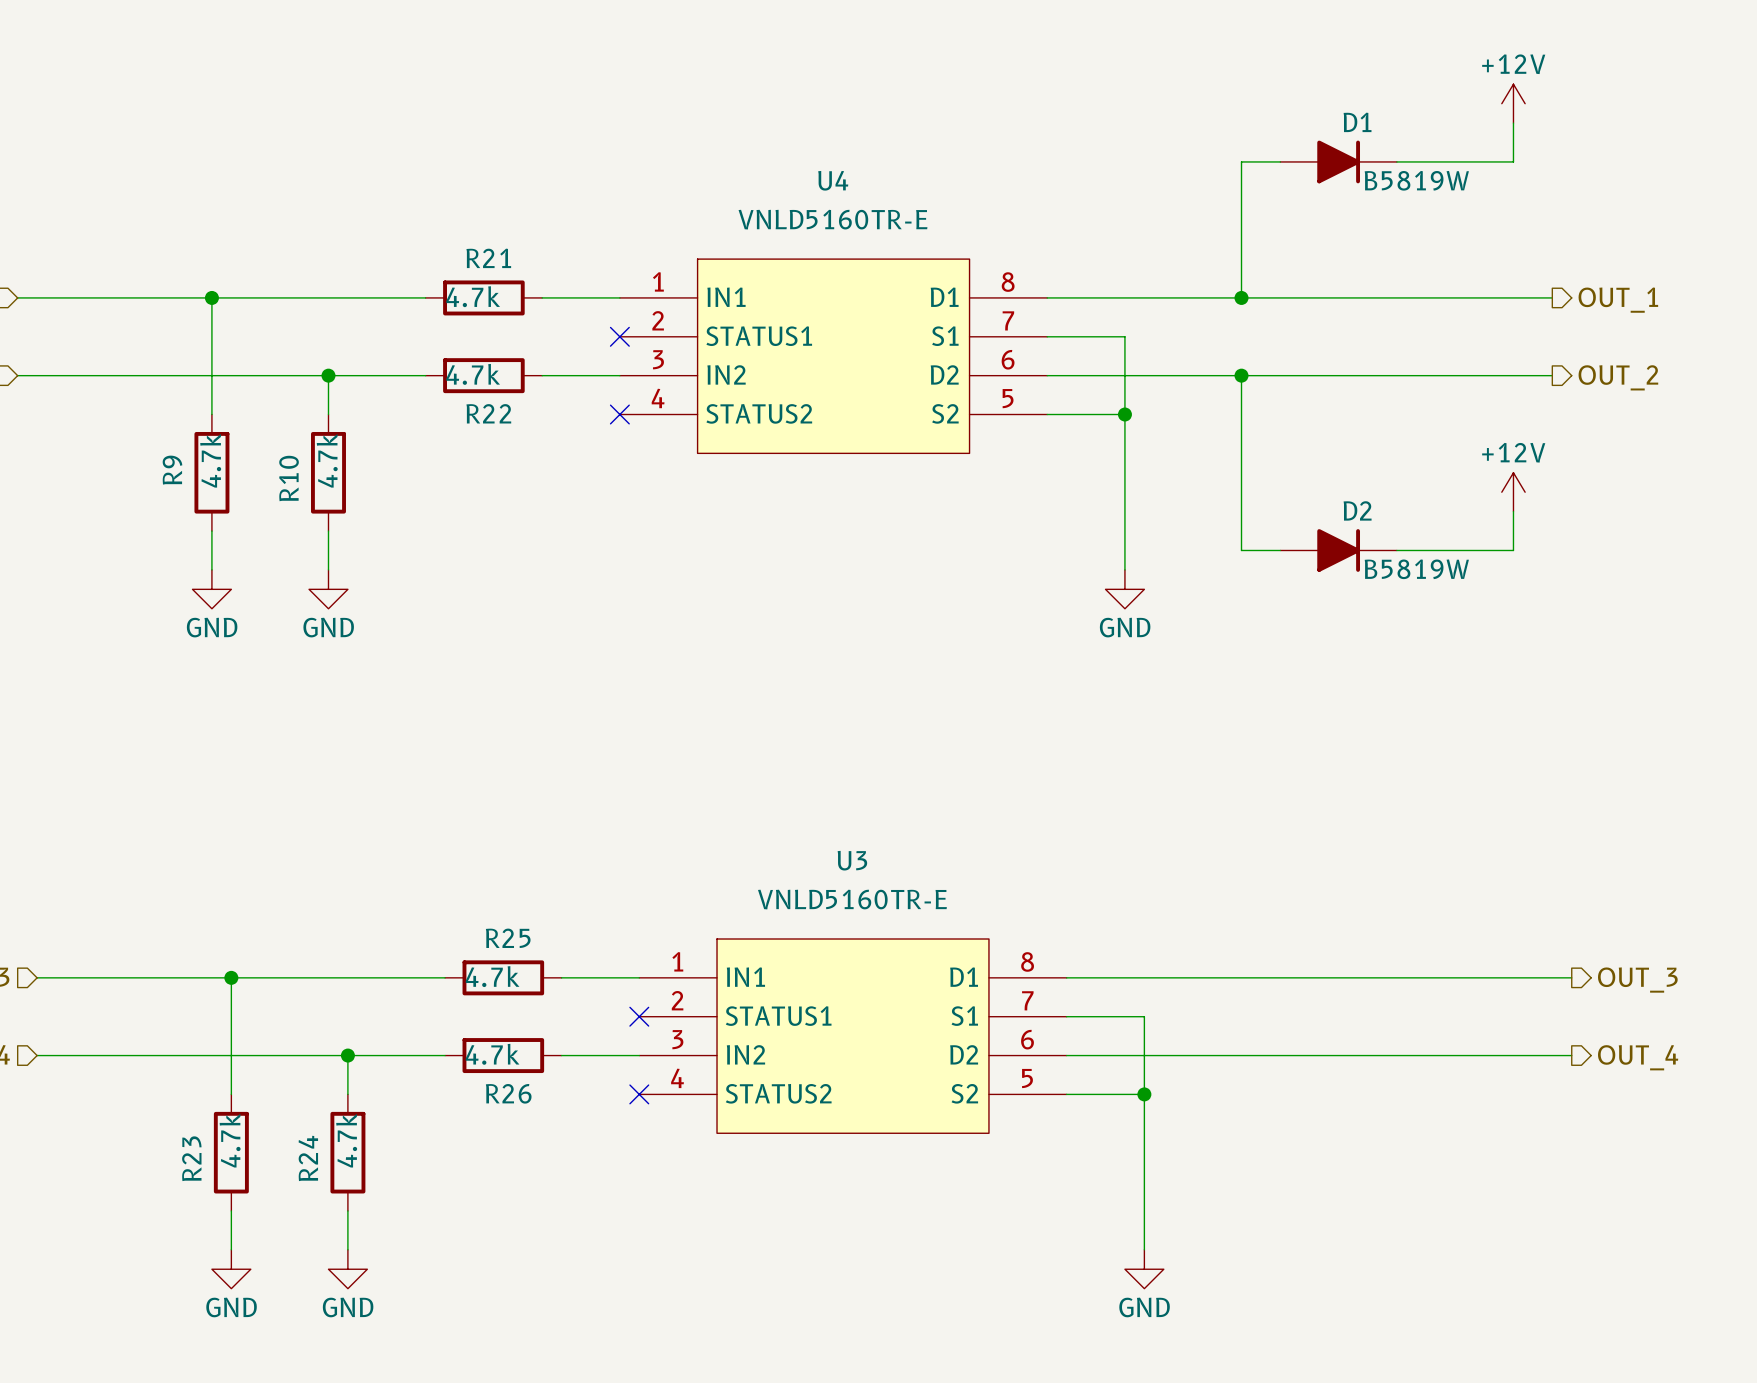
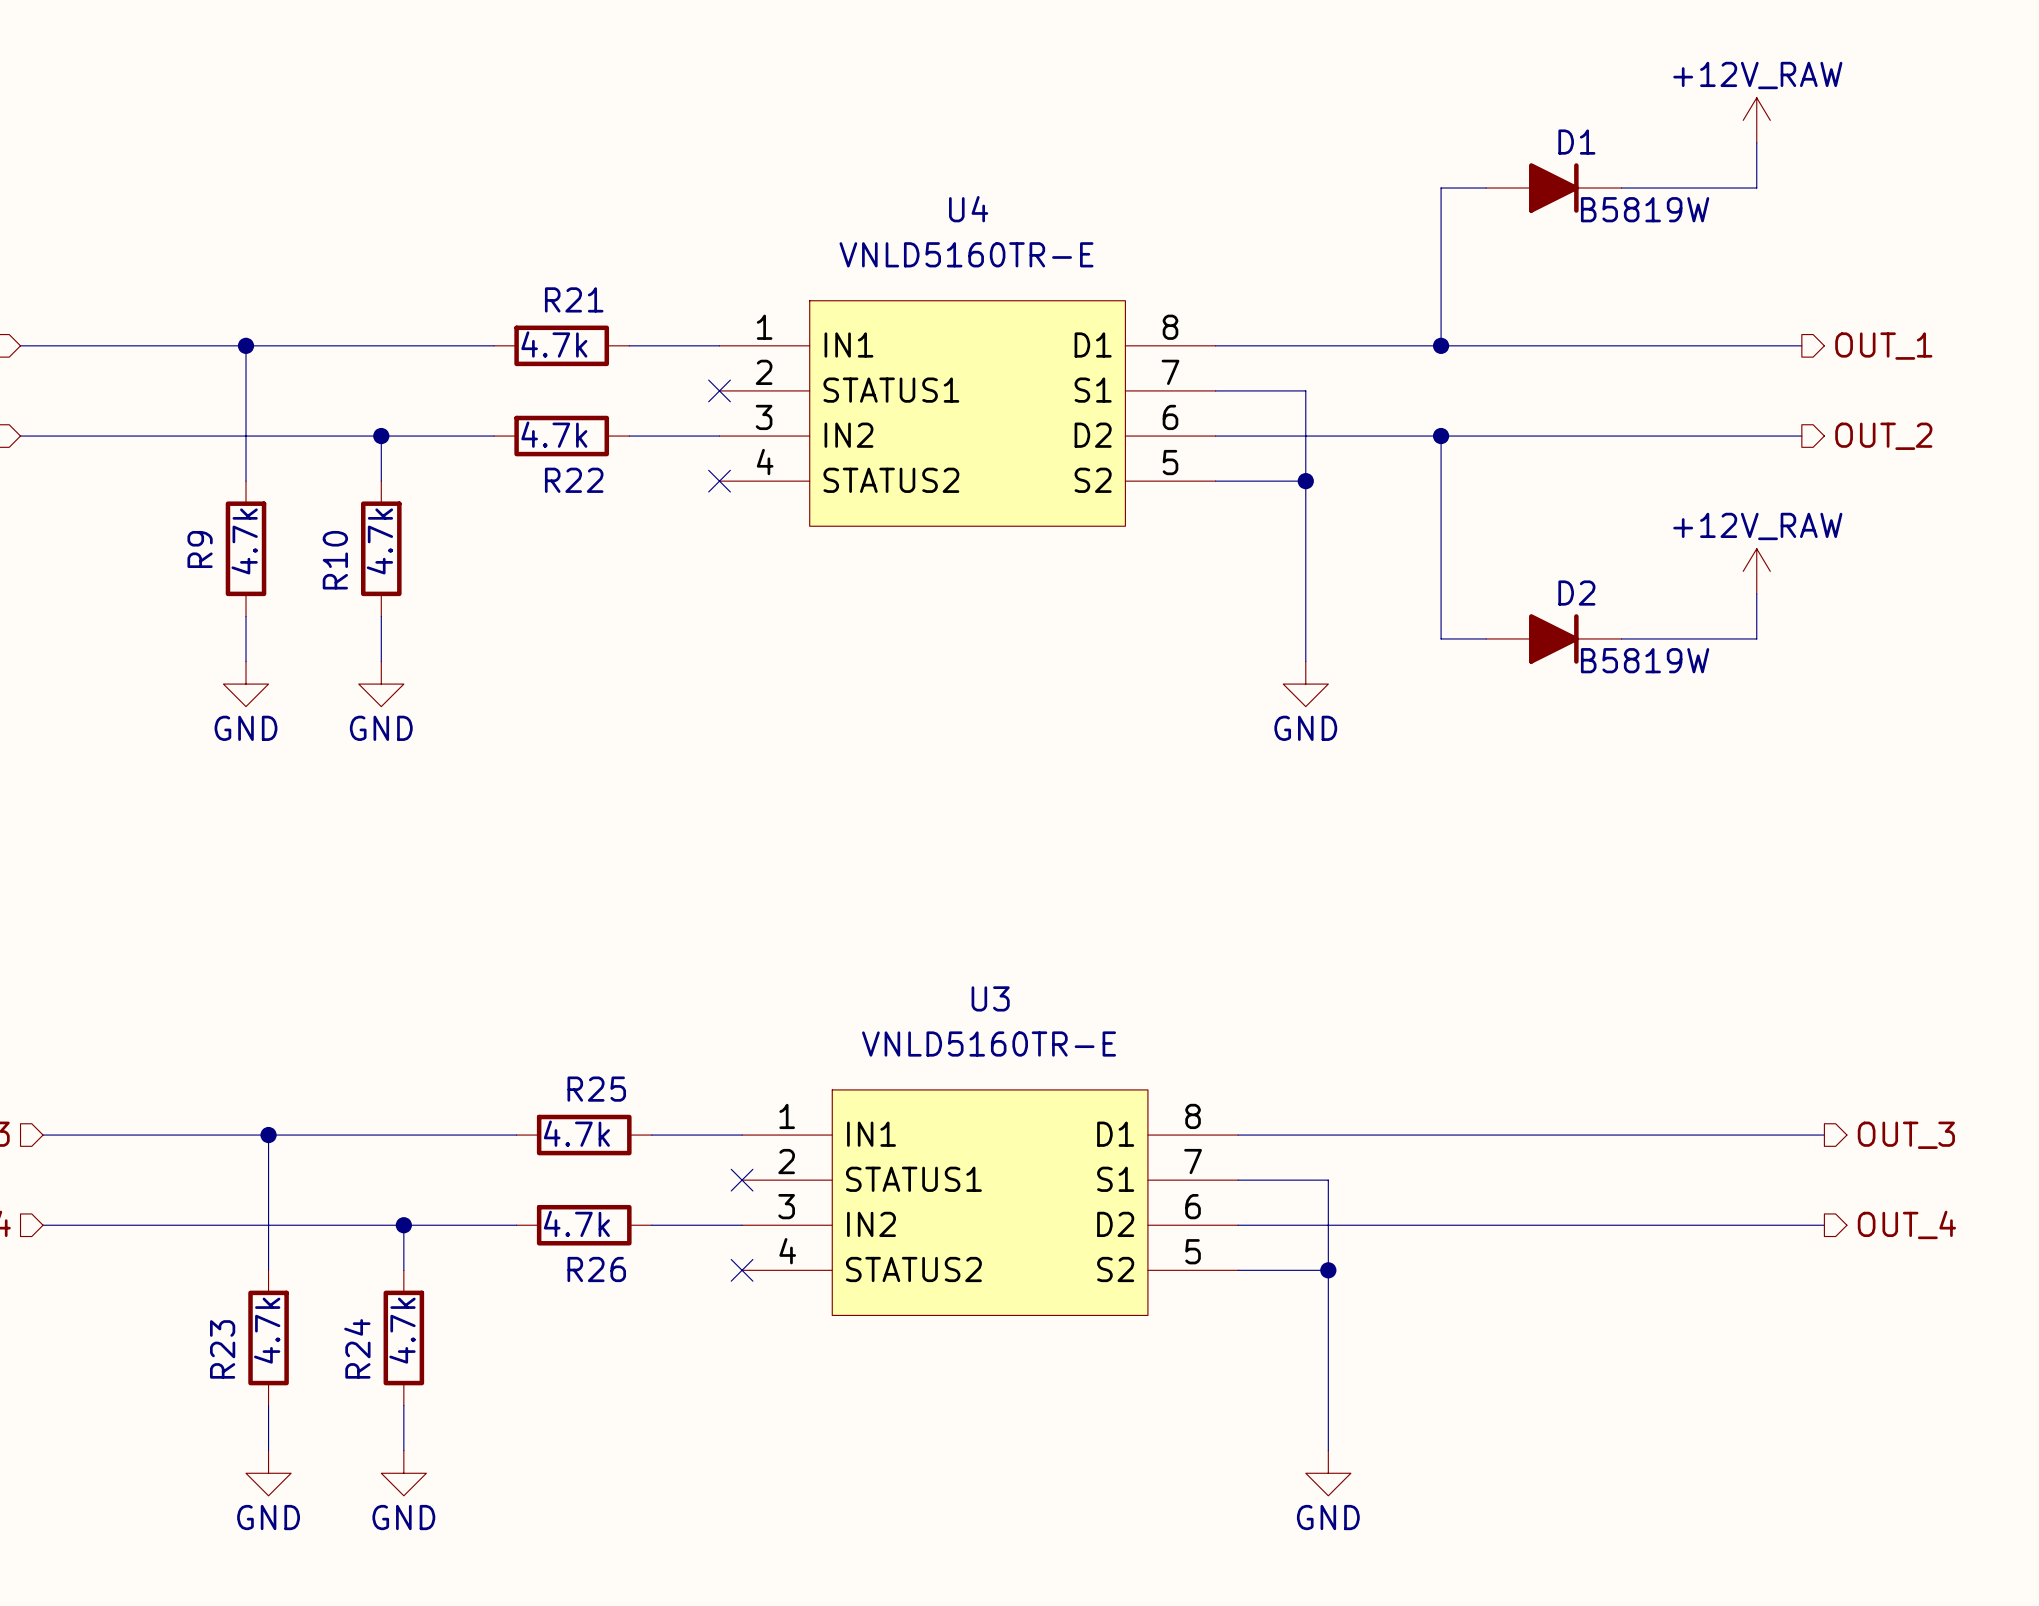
power symbol: +12V (1513, 103) -> +12V_RAW (1756, 120)
power symbol: +12V (1513, 492) -> +12V_RAW (1756, 571)

